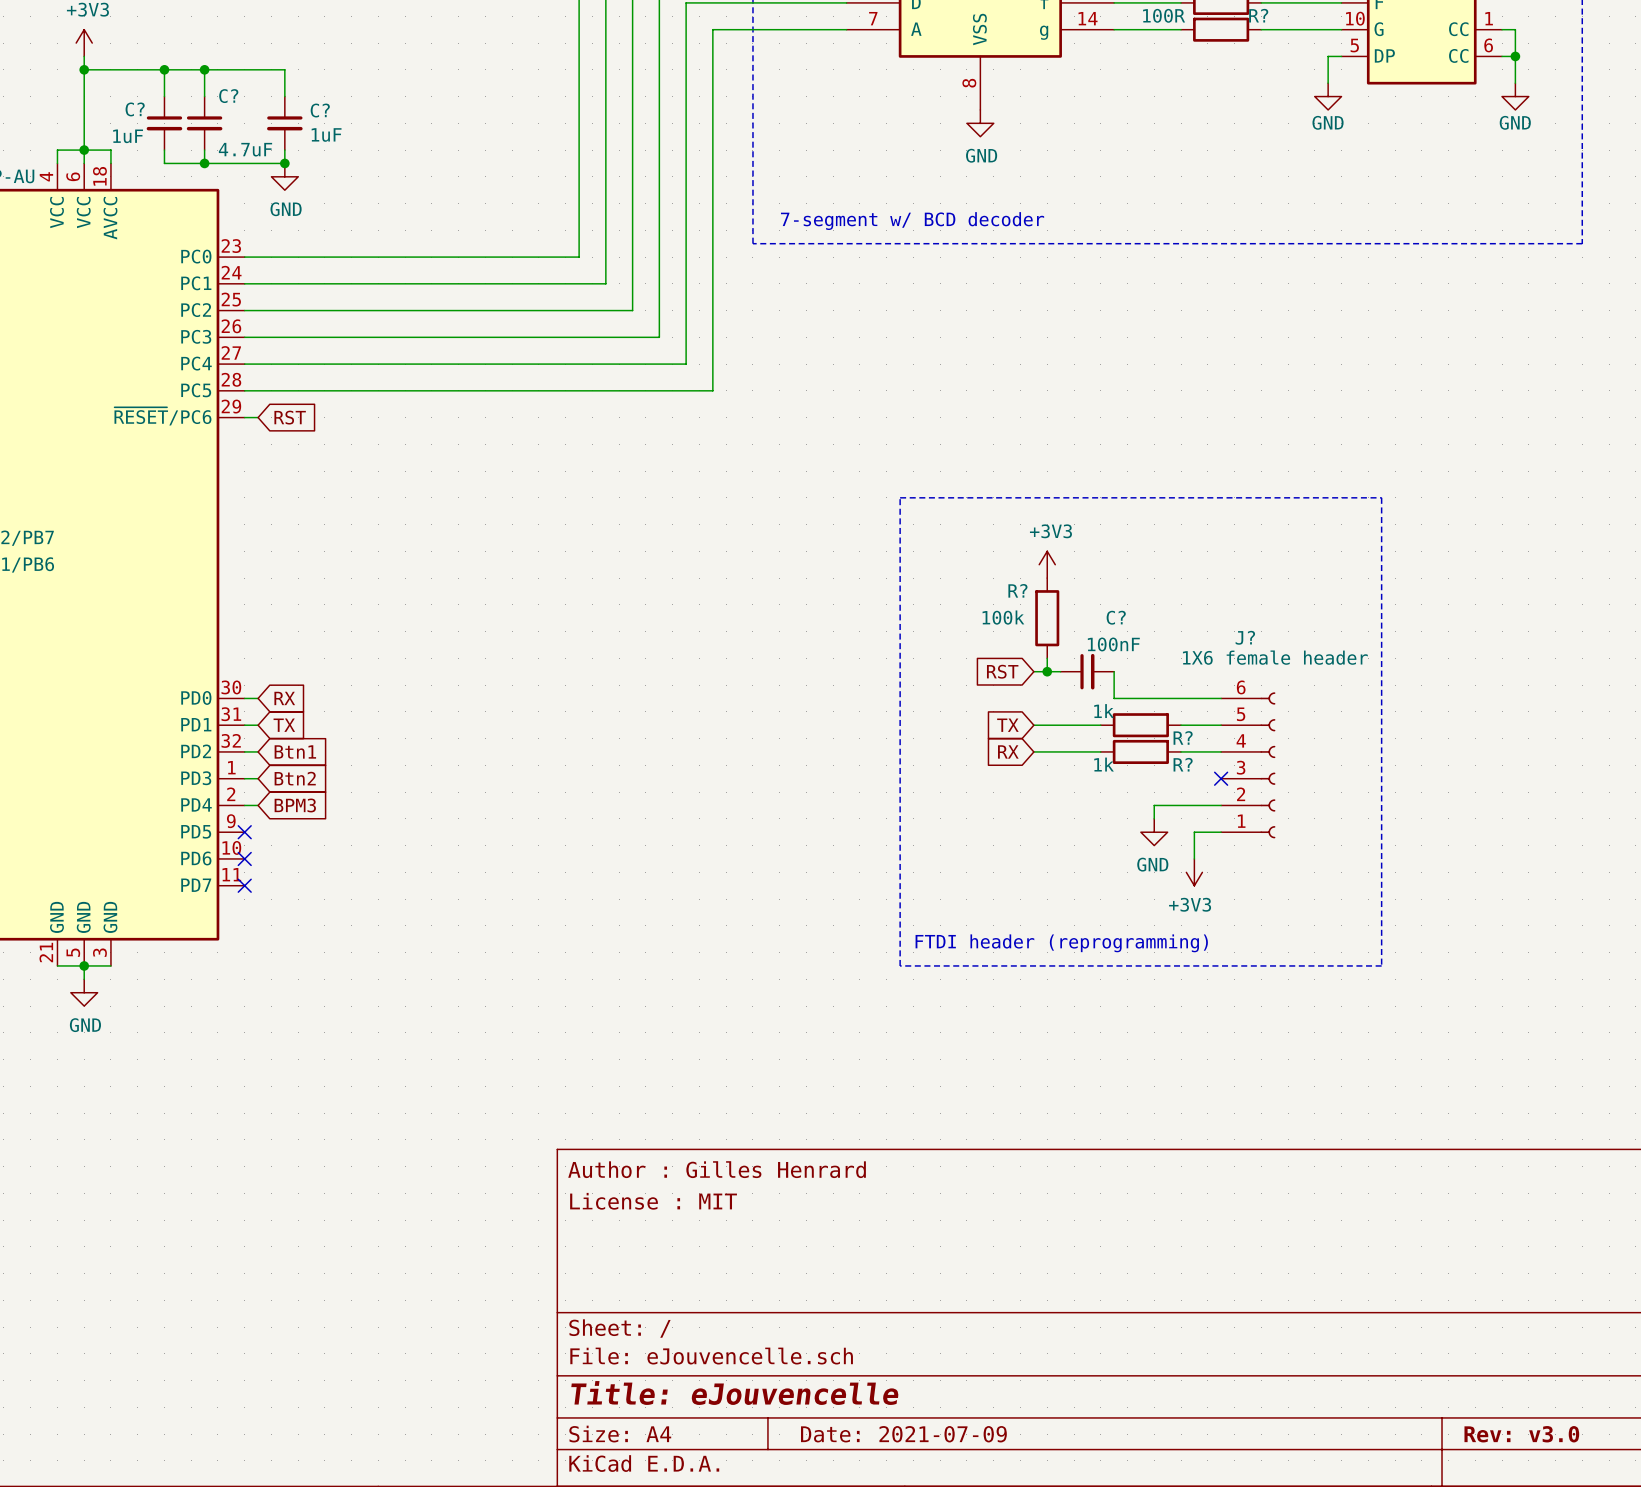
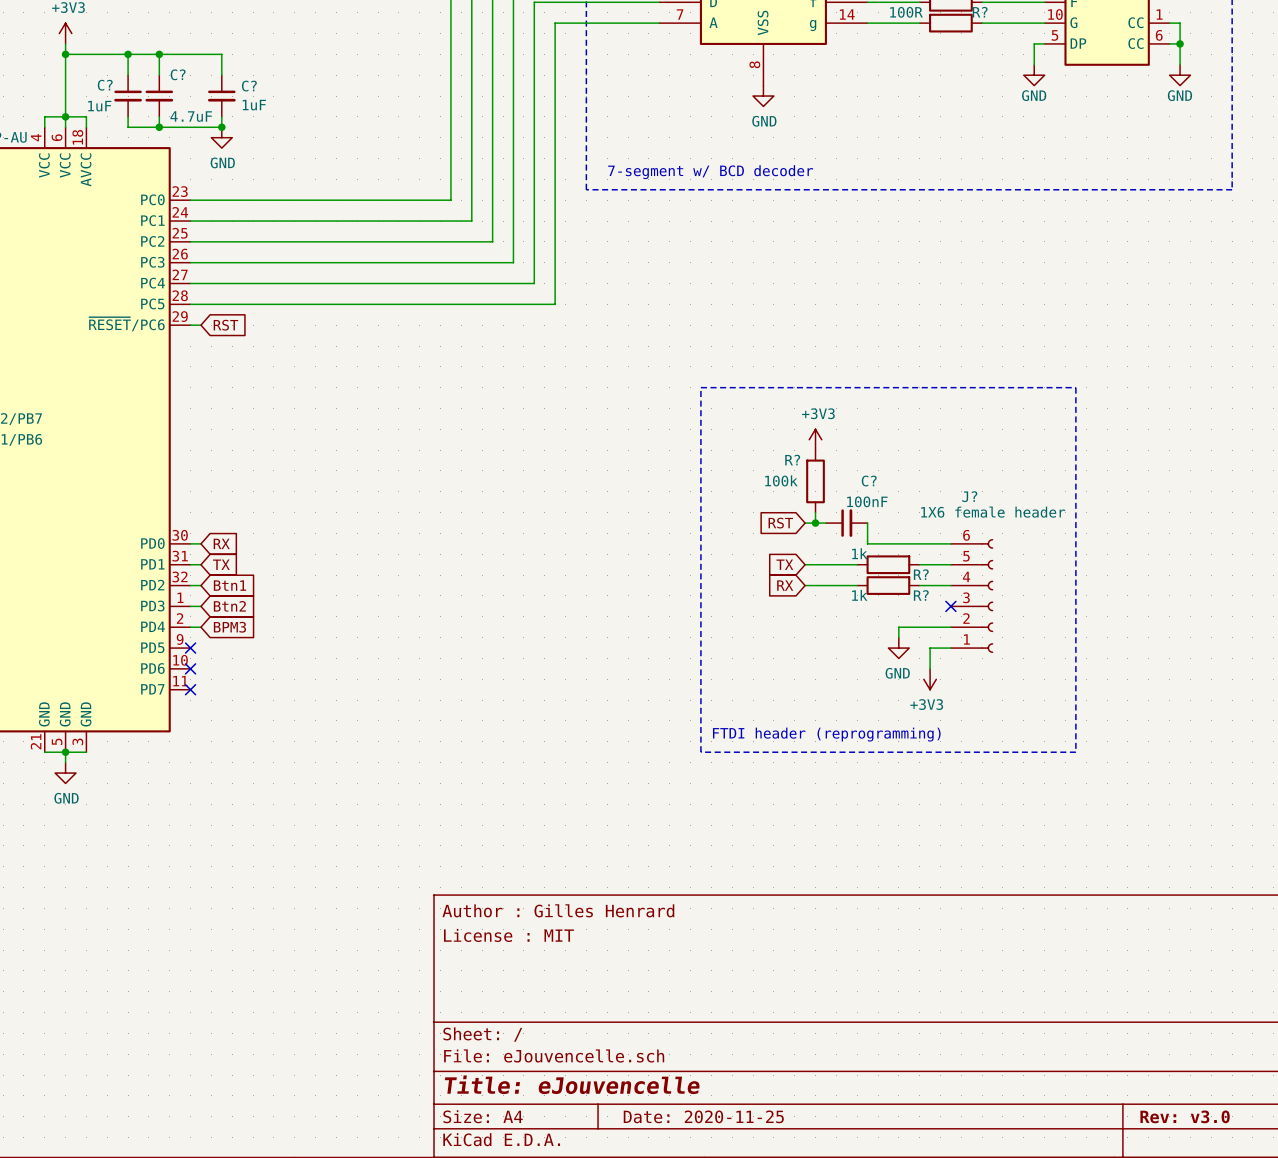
title block: Date: 2021-07-09 (903, 1434) -> Date: 2020-11-25 (703, 1116)

